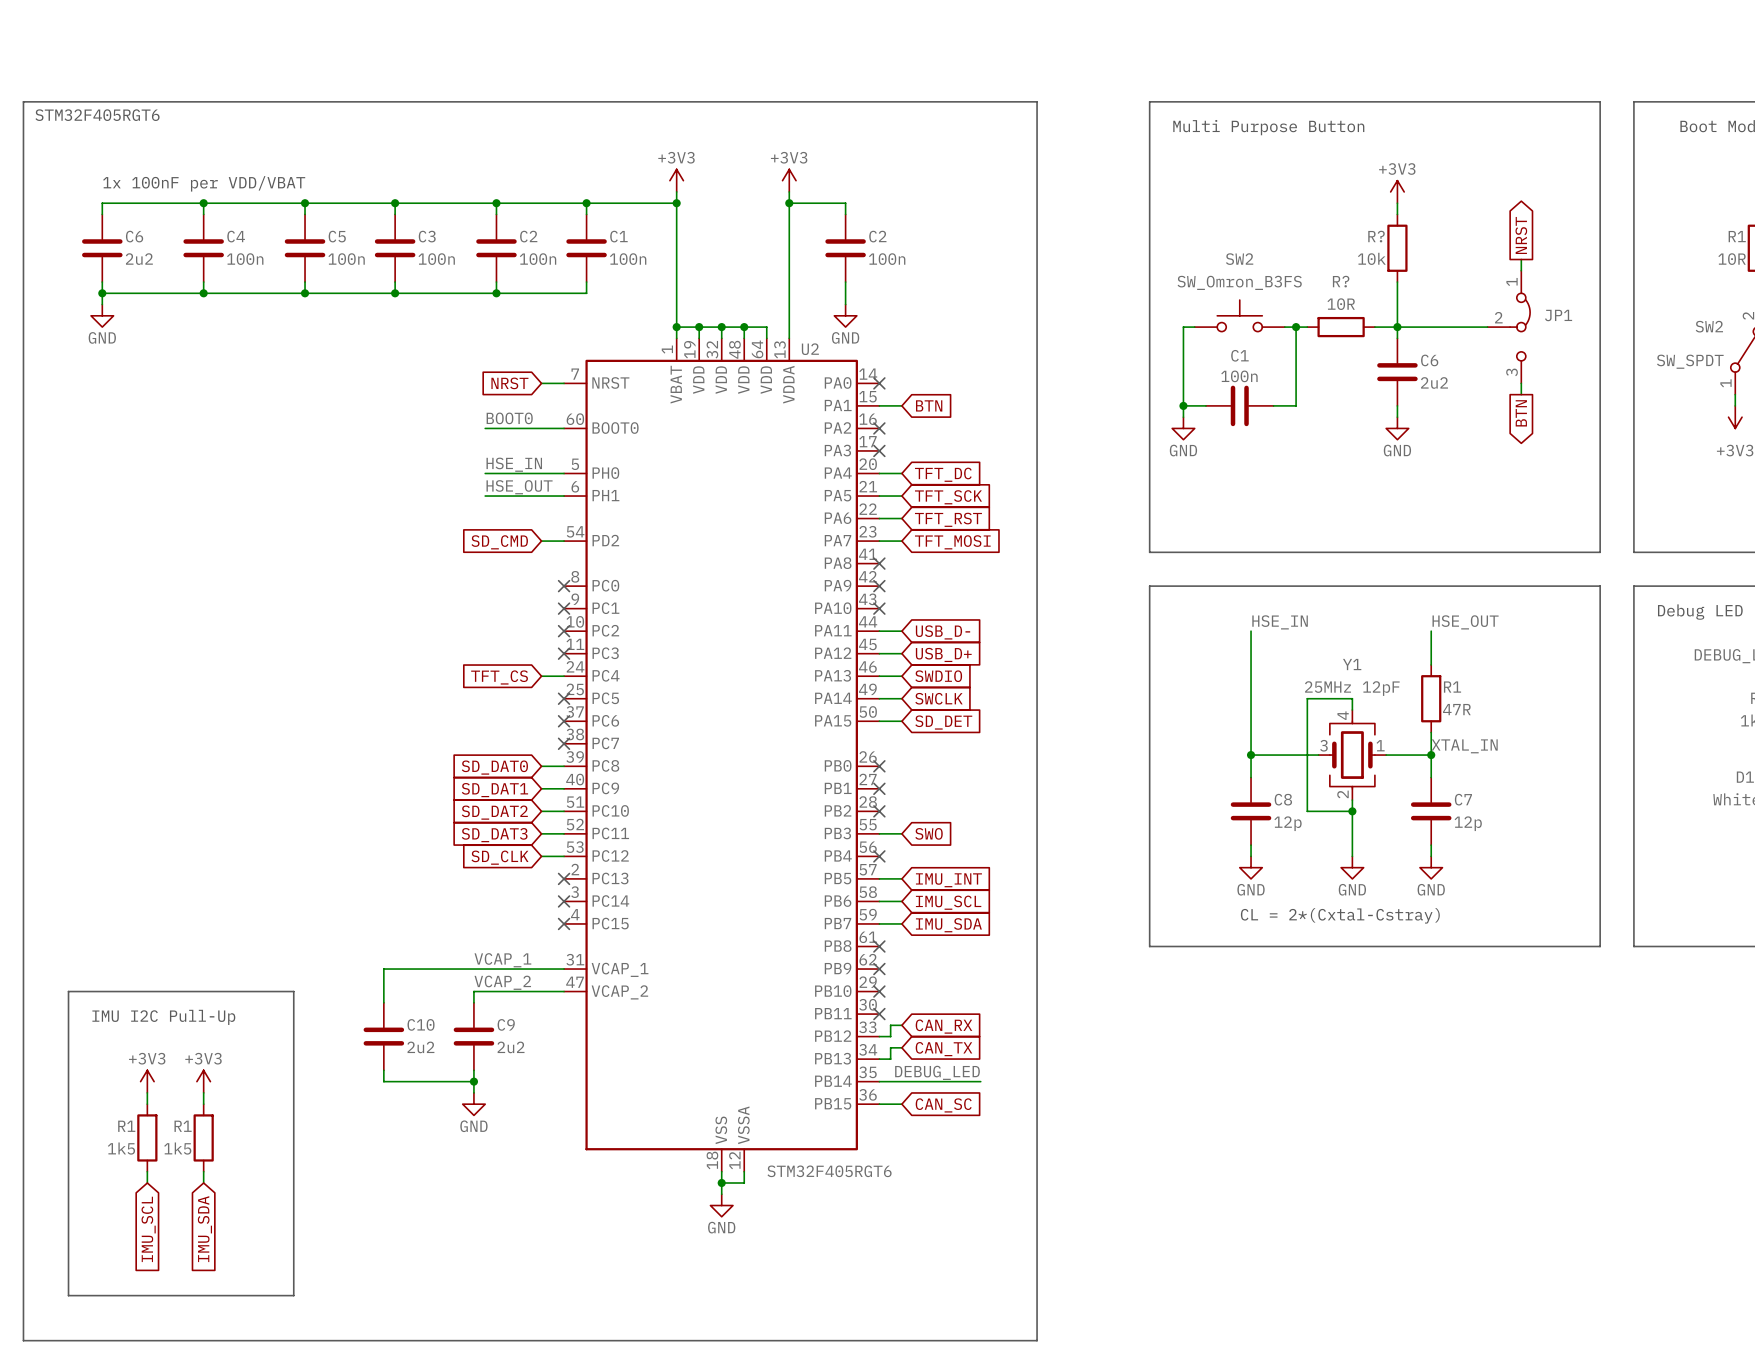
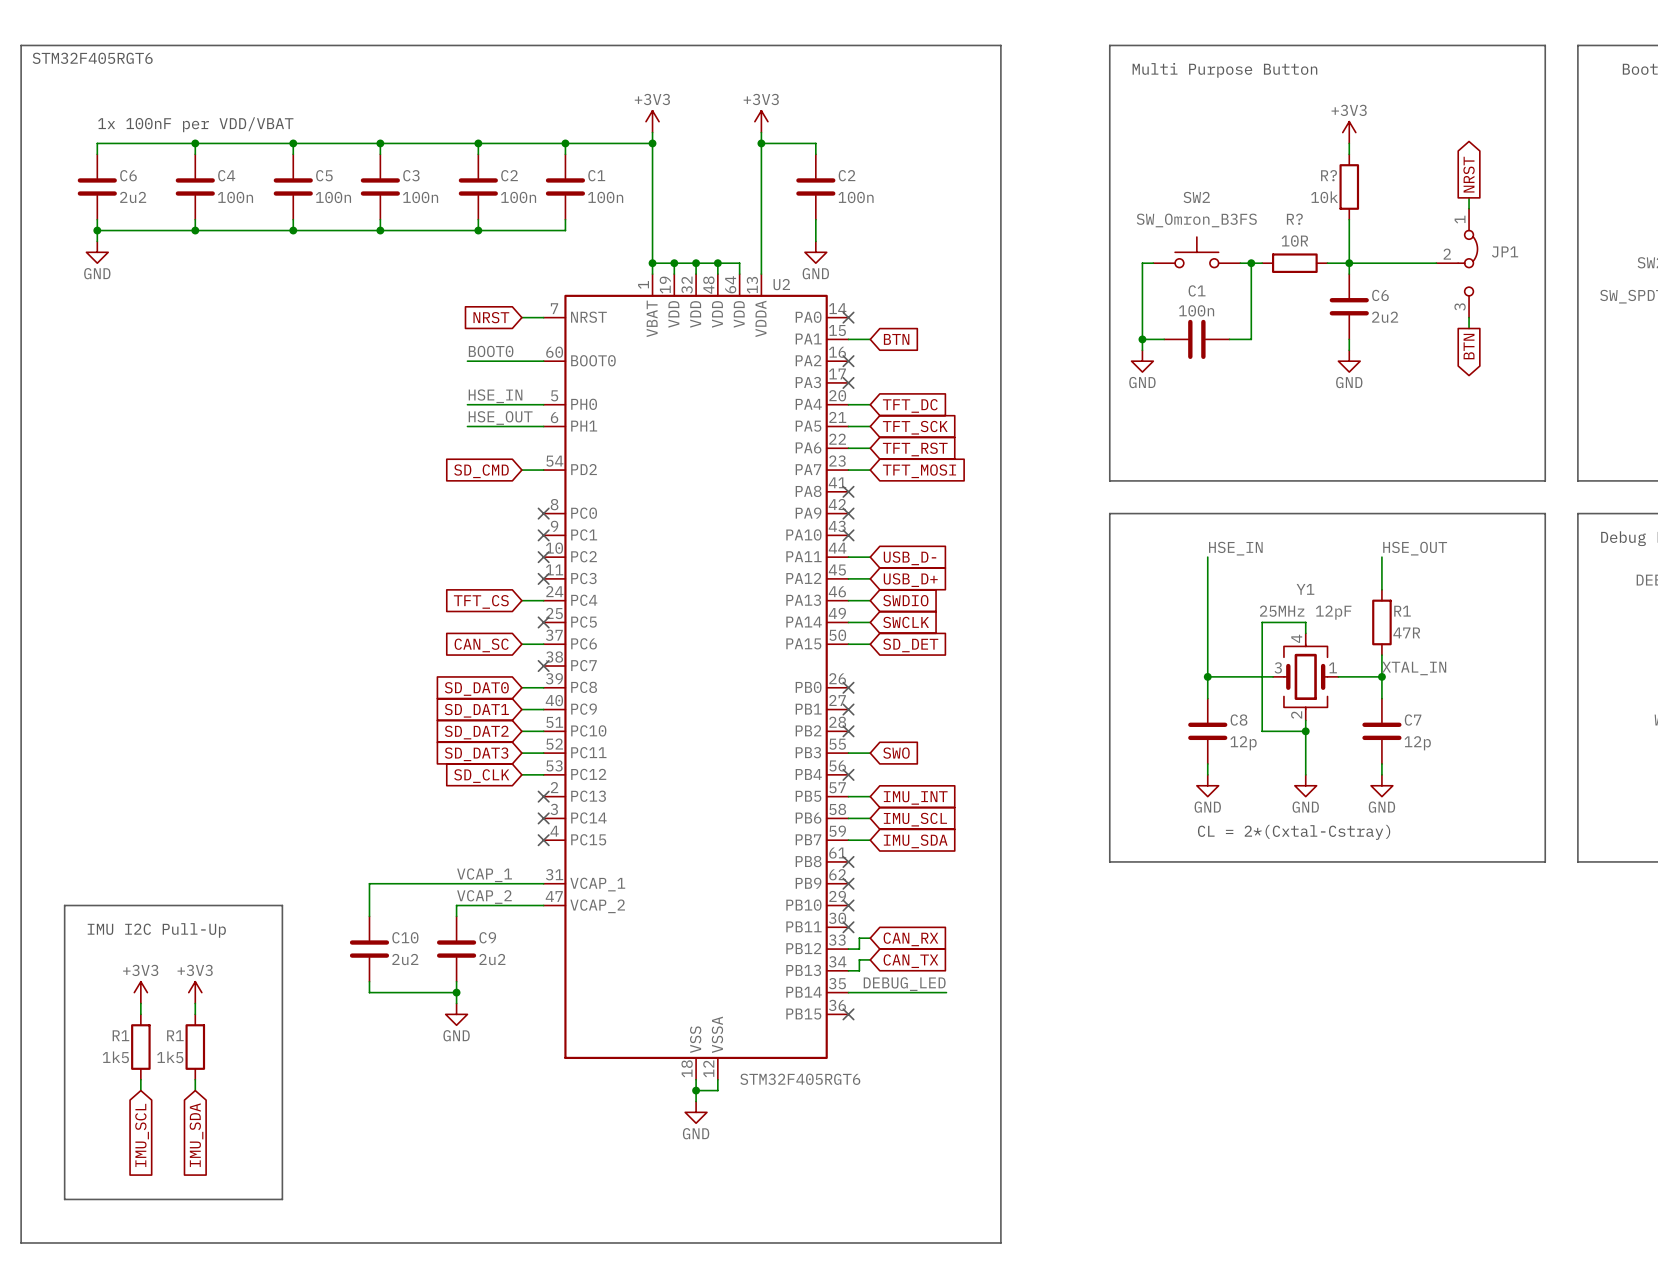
wire: none -> (521, 644) (543, 644)
no-connect mark: (564, 721) -> none
global label: none -> CAN_SC (481, 645)
wire: (879, 1104) (901, 1104) -> none
no-connect mark: none -> (848, 1014)
global label: CAN_SC (943, 1105) -> none

